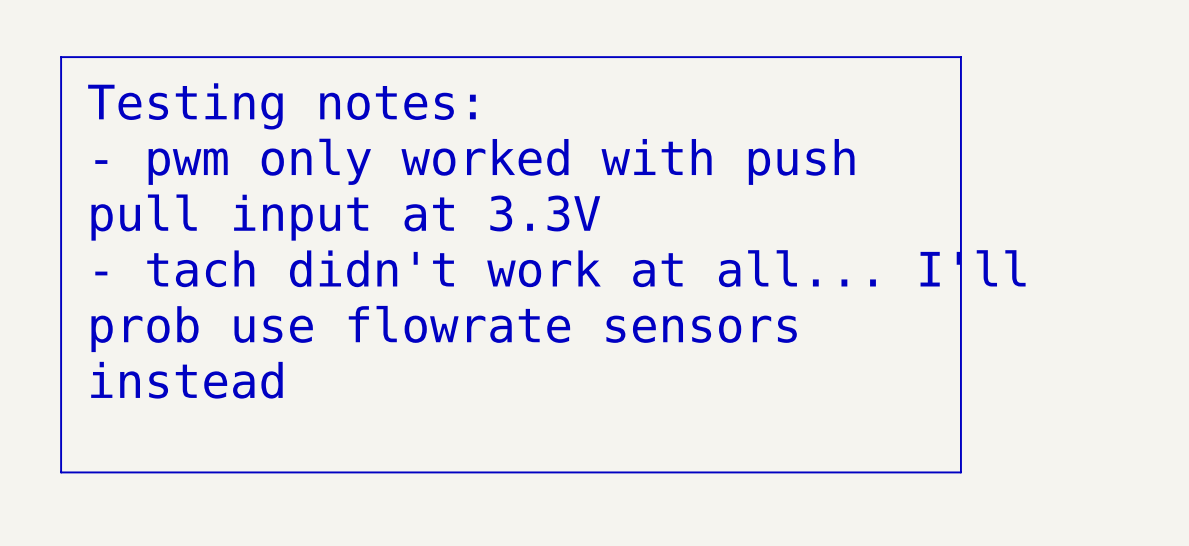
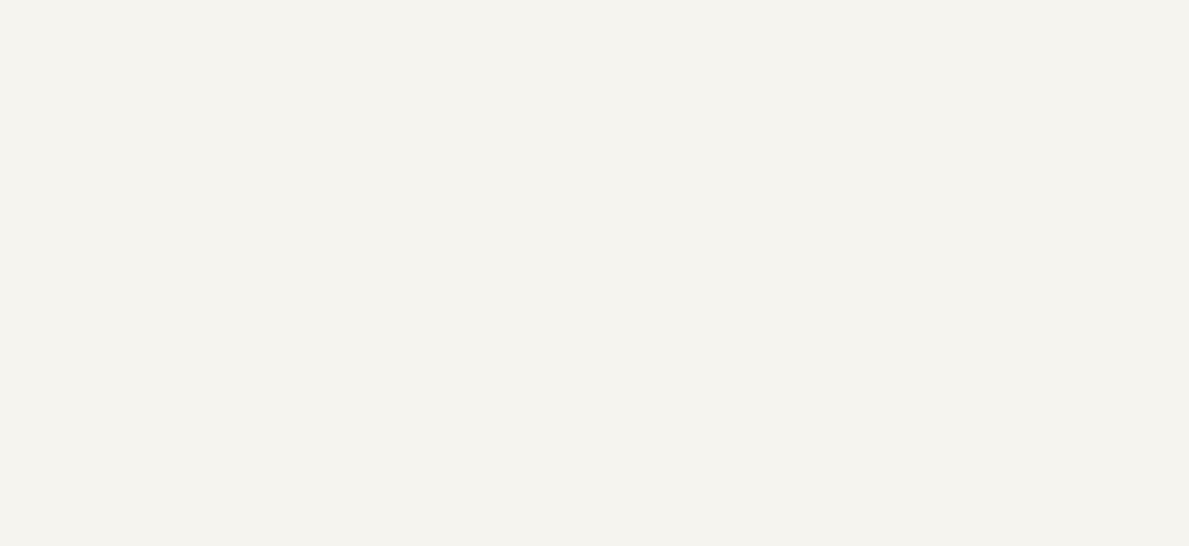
line: (61, 57) (960, 57) (960, 472) (61, 472) (61, 57) -> none
text: Testing notes: (281, 106) -> none
text: - pwm only worked with push (474, 161) -> none
text: pull input at 3.3V (345, 217) -> none
text: - tach didn't work at all... I'll (560, 268) -> none
text: prob use flowrate sensors (444, 328) -> none
text: instead (186, 380) -> none

